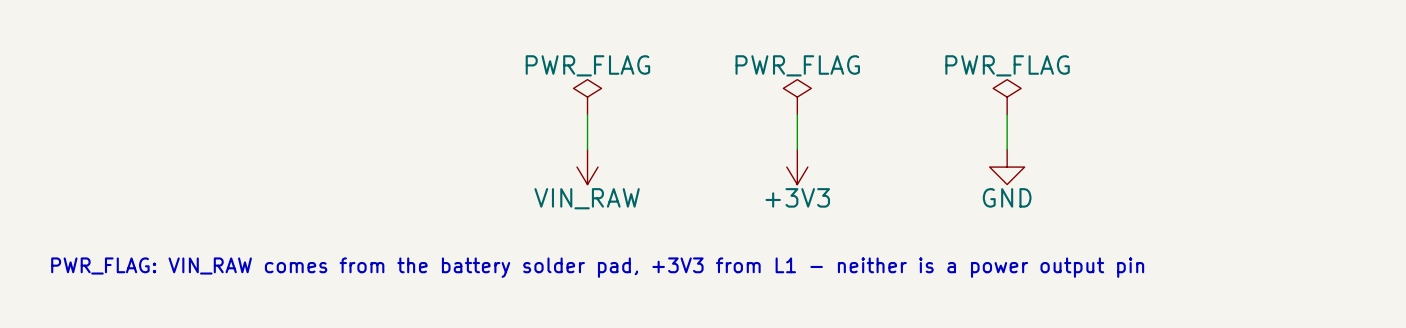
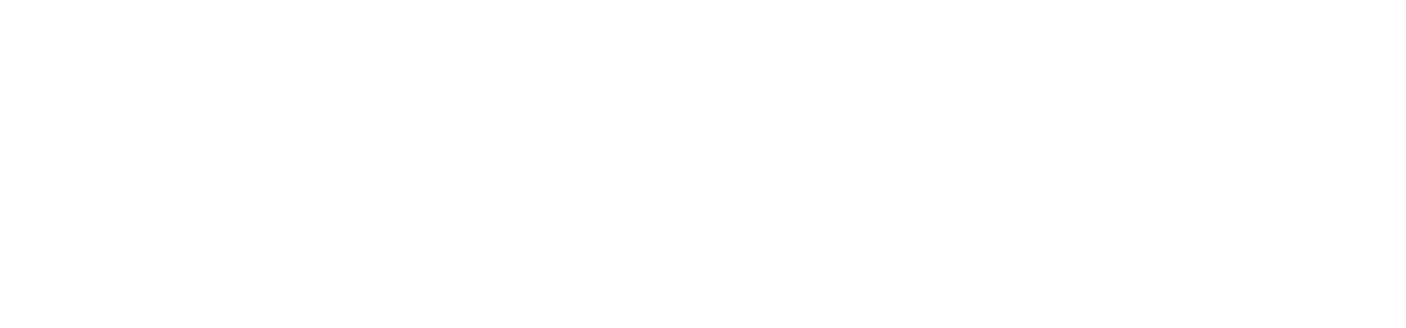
power symbol: PWR_FLAG (587, 97) -> none
power symbol: PWR_FLAG (797, 97) -> none
power symbol: PWR_FLAG (1007, 97) -> none
wire: (587, 114) (587, 149) -> none
wire: (797, 114) (797, 149) -> none
wire: (1007, 114) (1007, 149) -> none
power symbol: VIN_RAW (587, 167) -> none
power symbol: +3V3 (797, 167) -> none
power symbol: GND (1007, 167) -> none
text: PWR_FLAG: VIN_RAW comes from the battery solder pad, +3V3 from L1 - neither is a power output pin (597, 267) -> none

